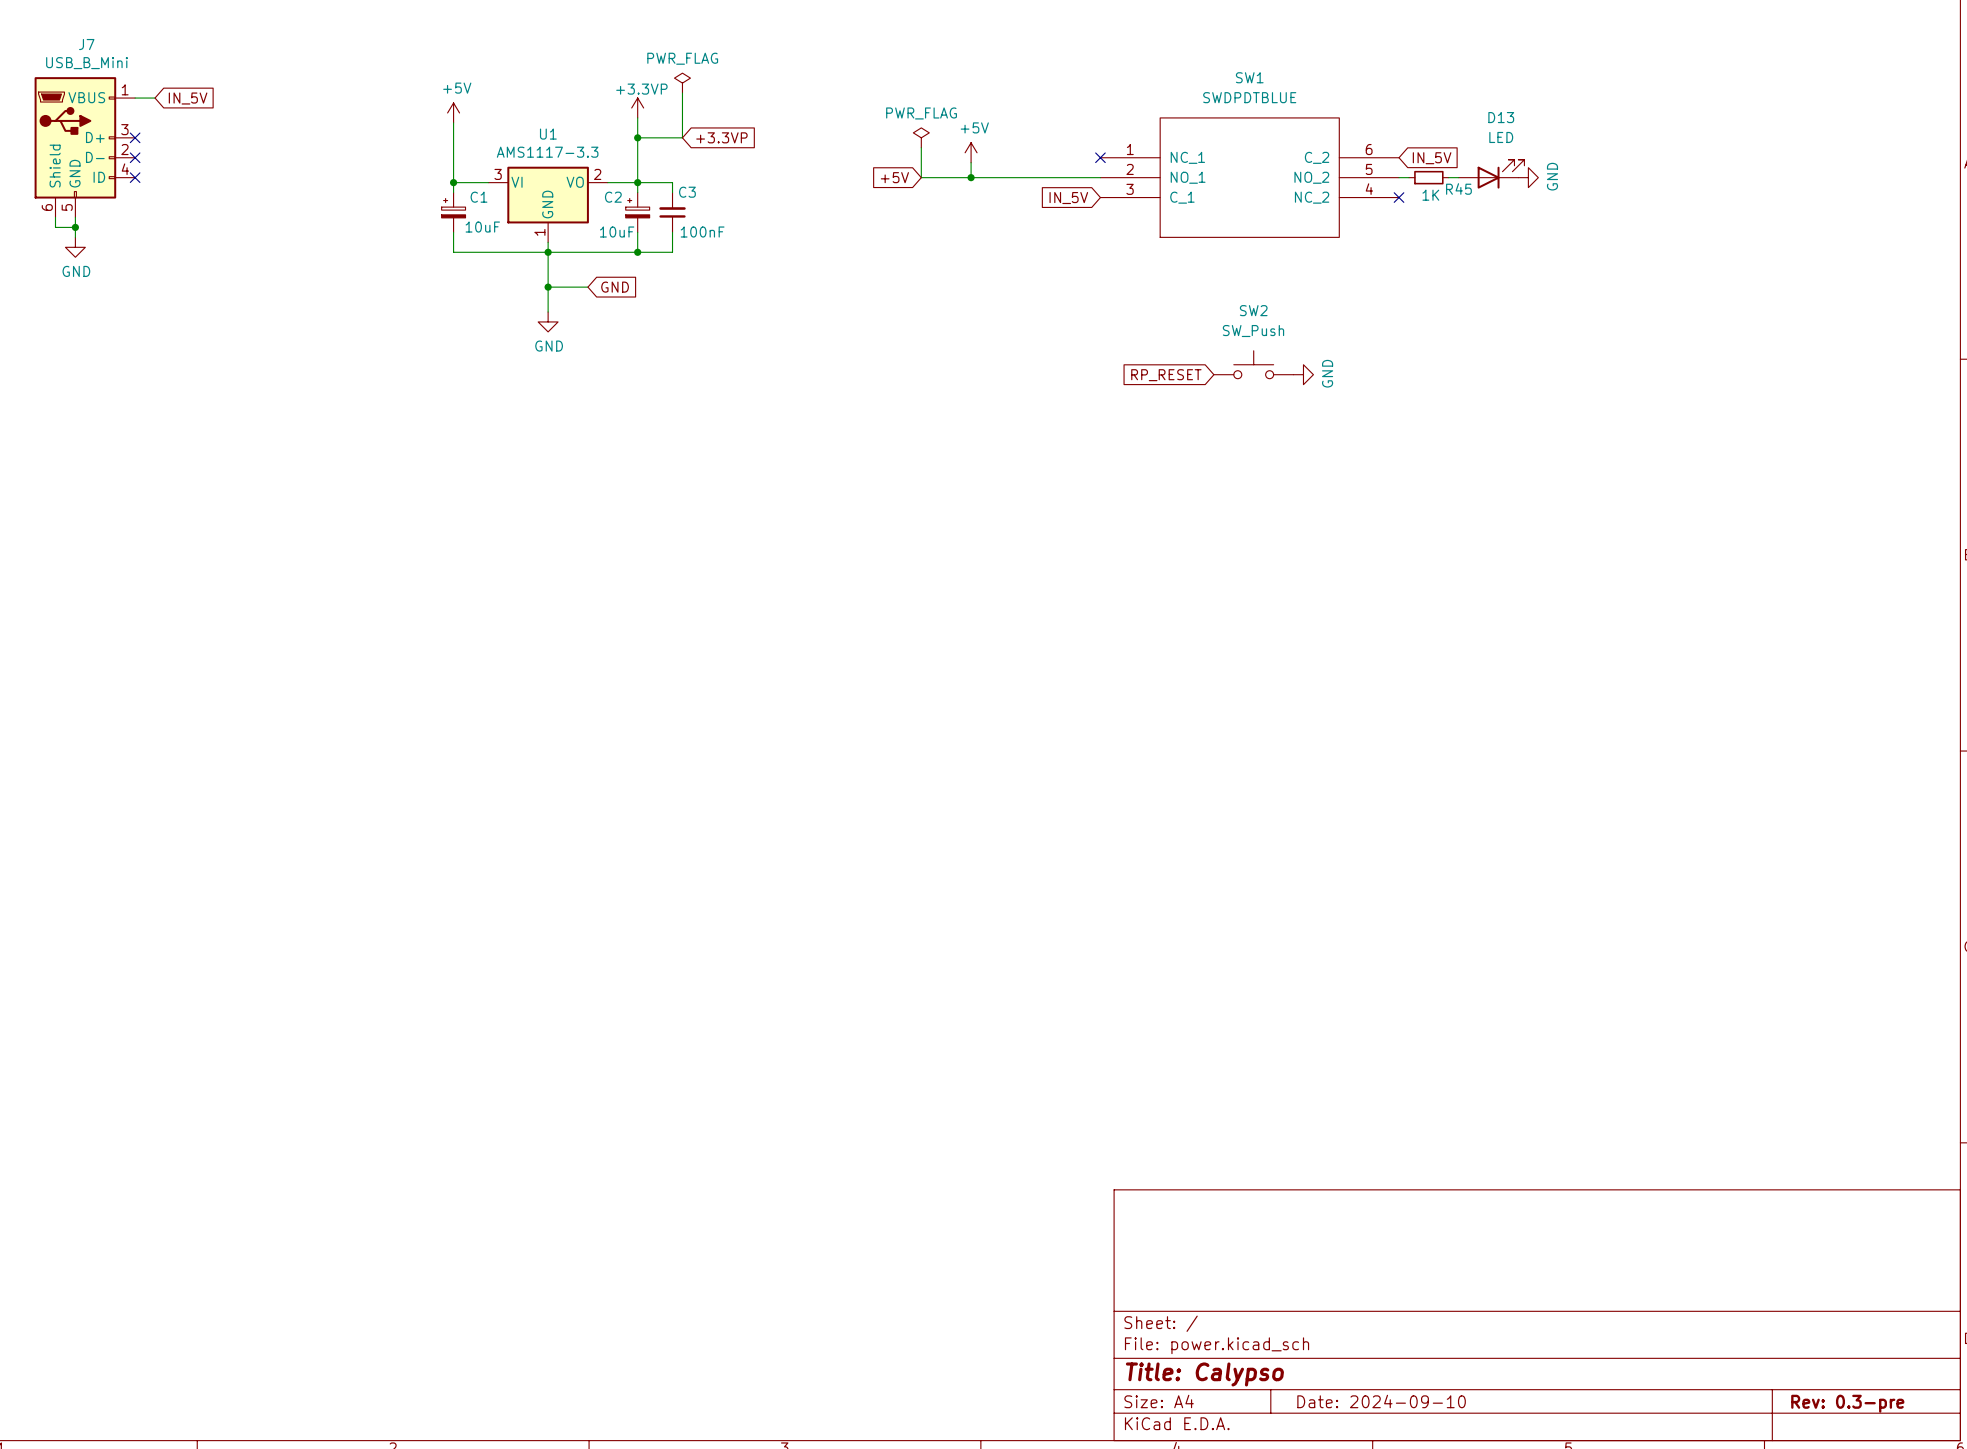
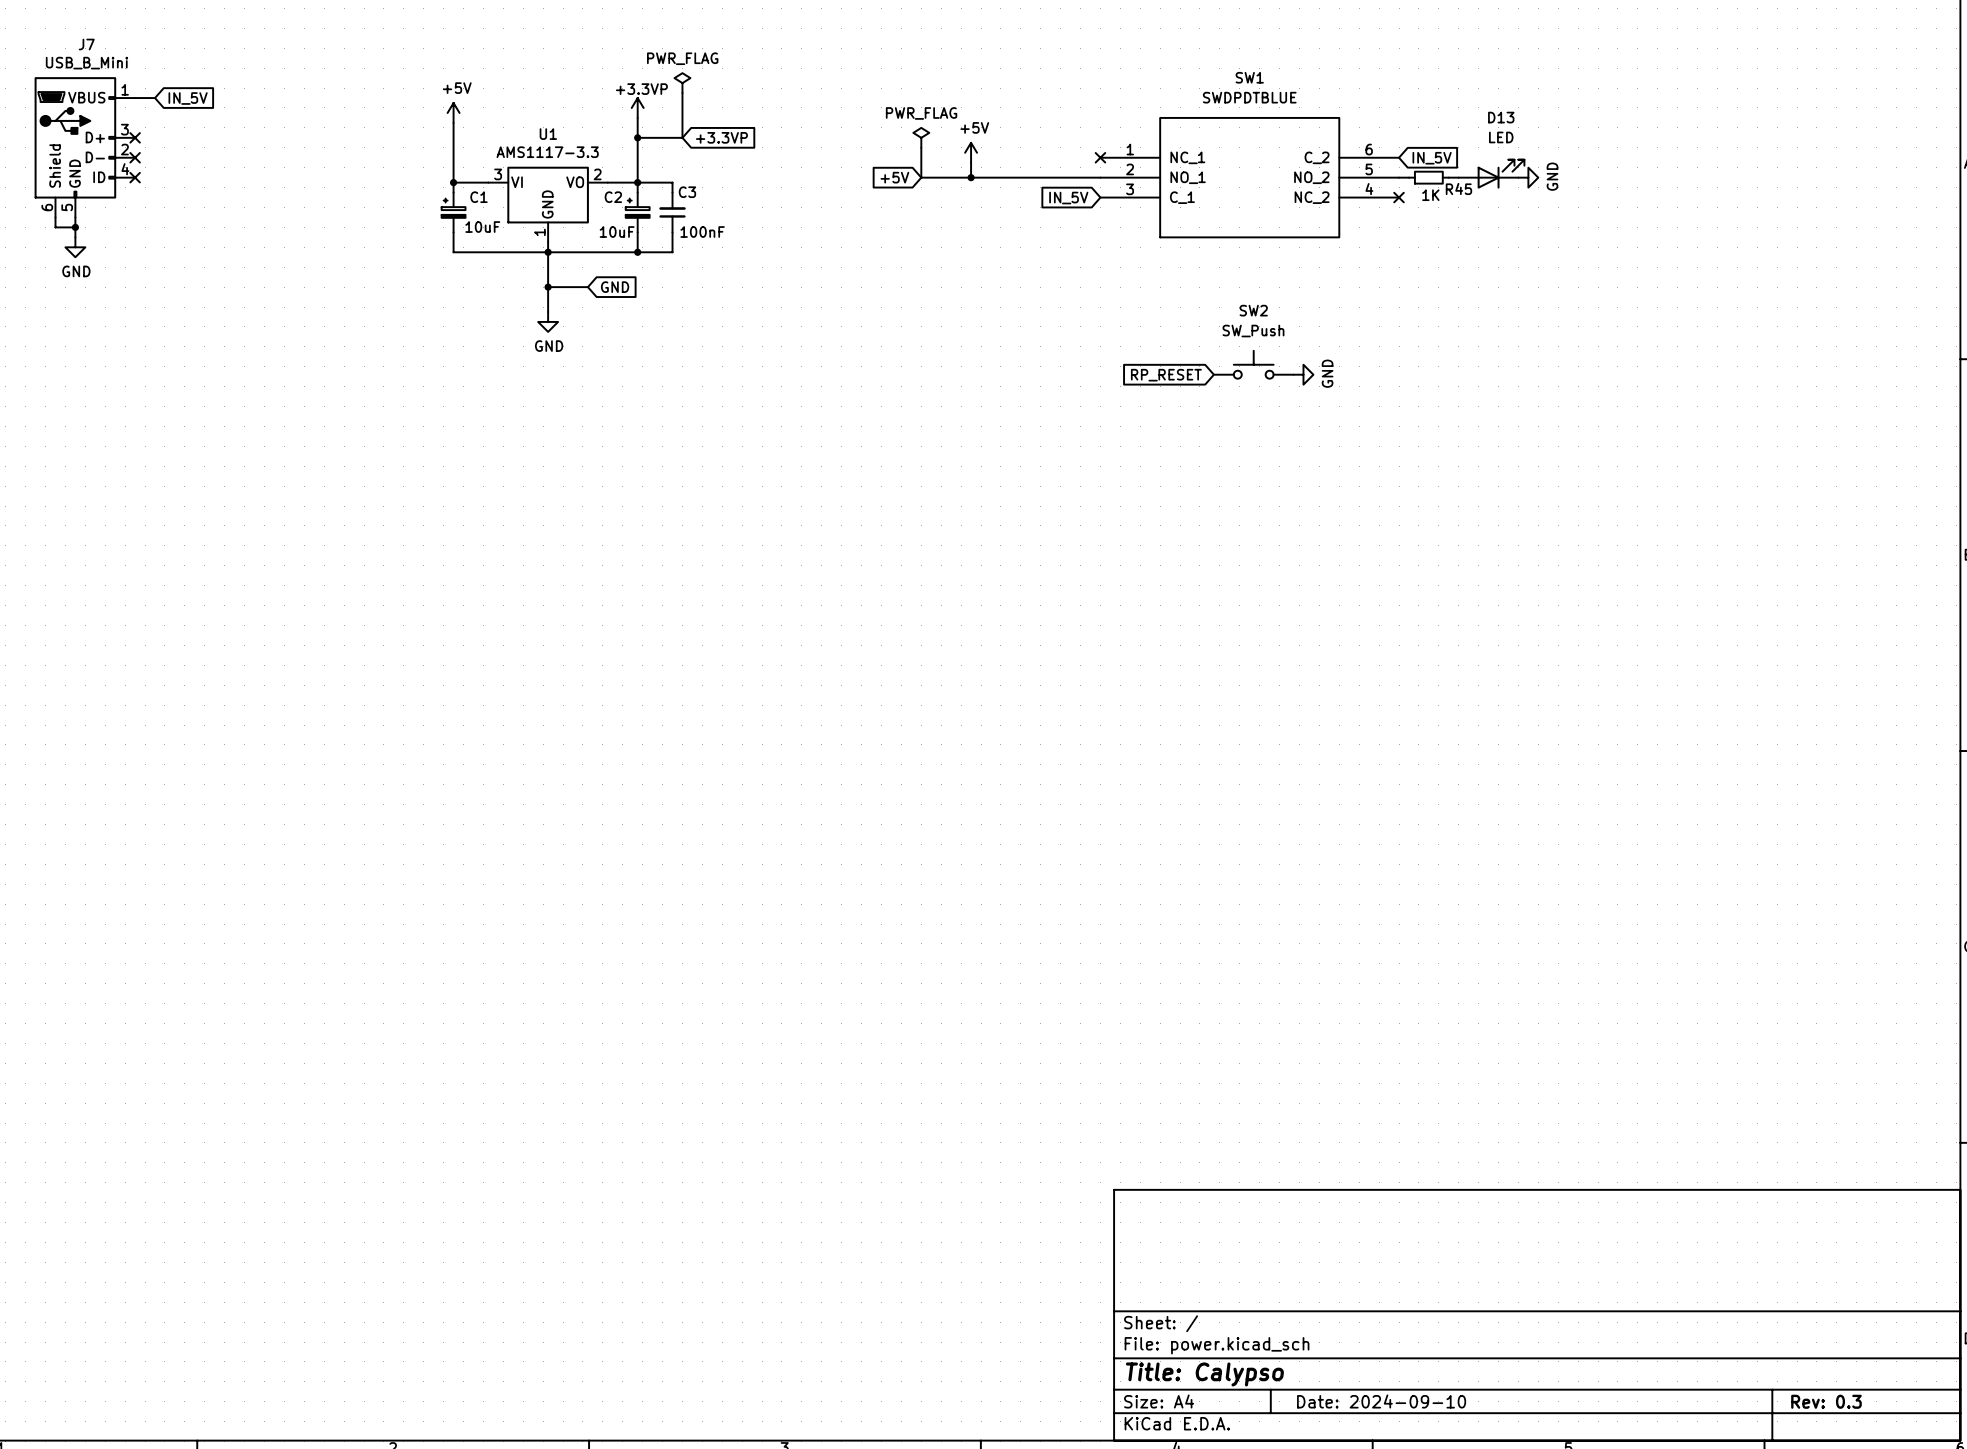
title block: Rev: 0.3-pre (1847, 1403) -> Rev: 0.3 (1826, 1401)

